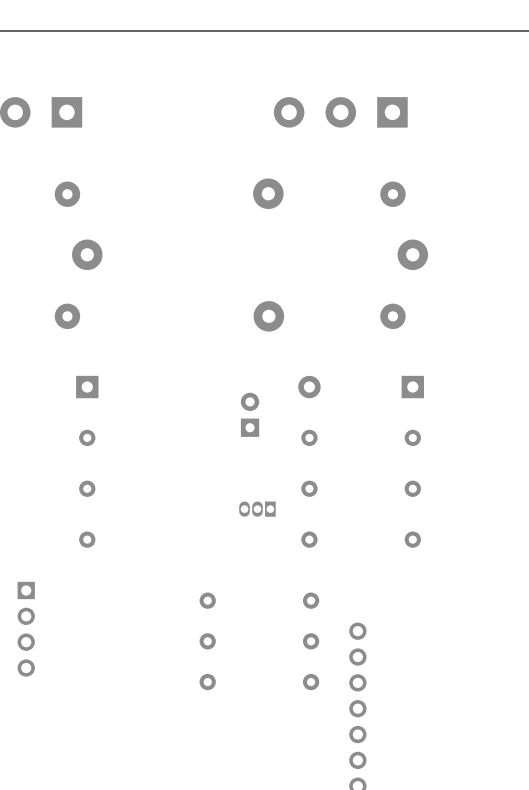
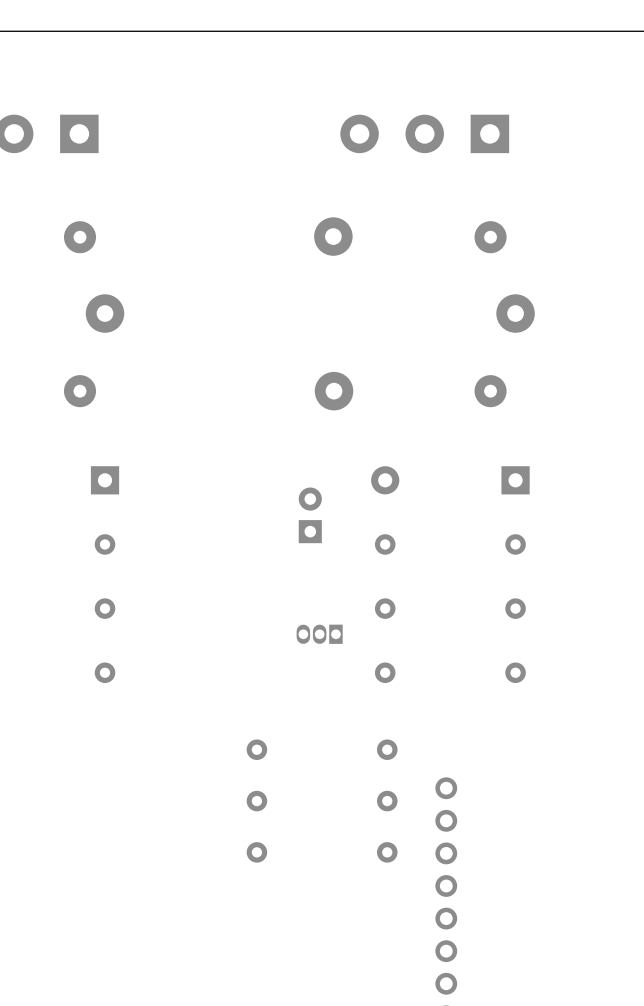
part: (26, 629) -> none

